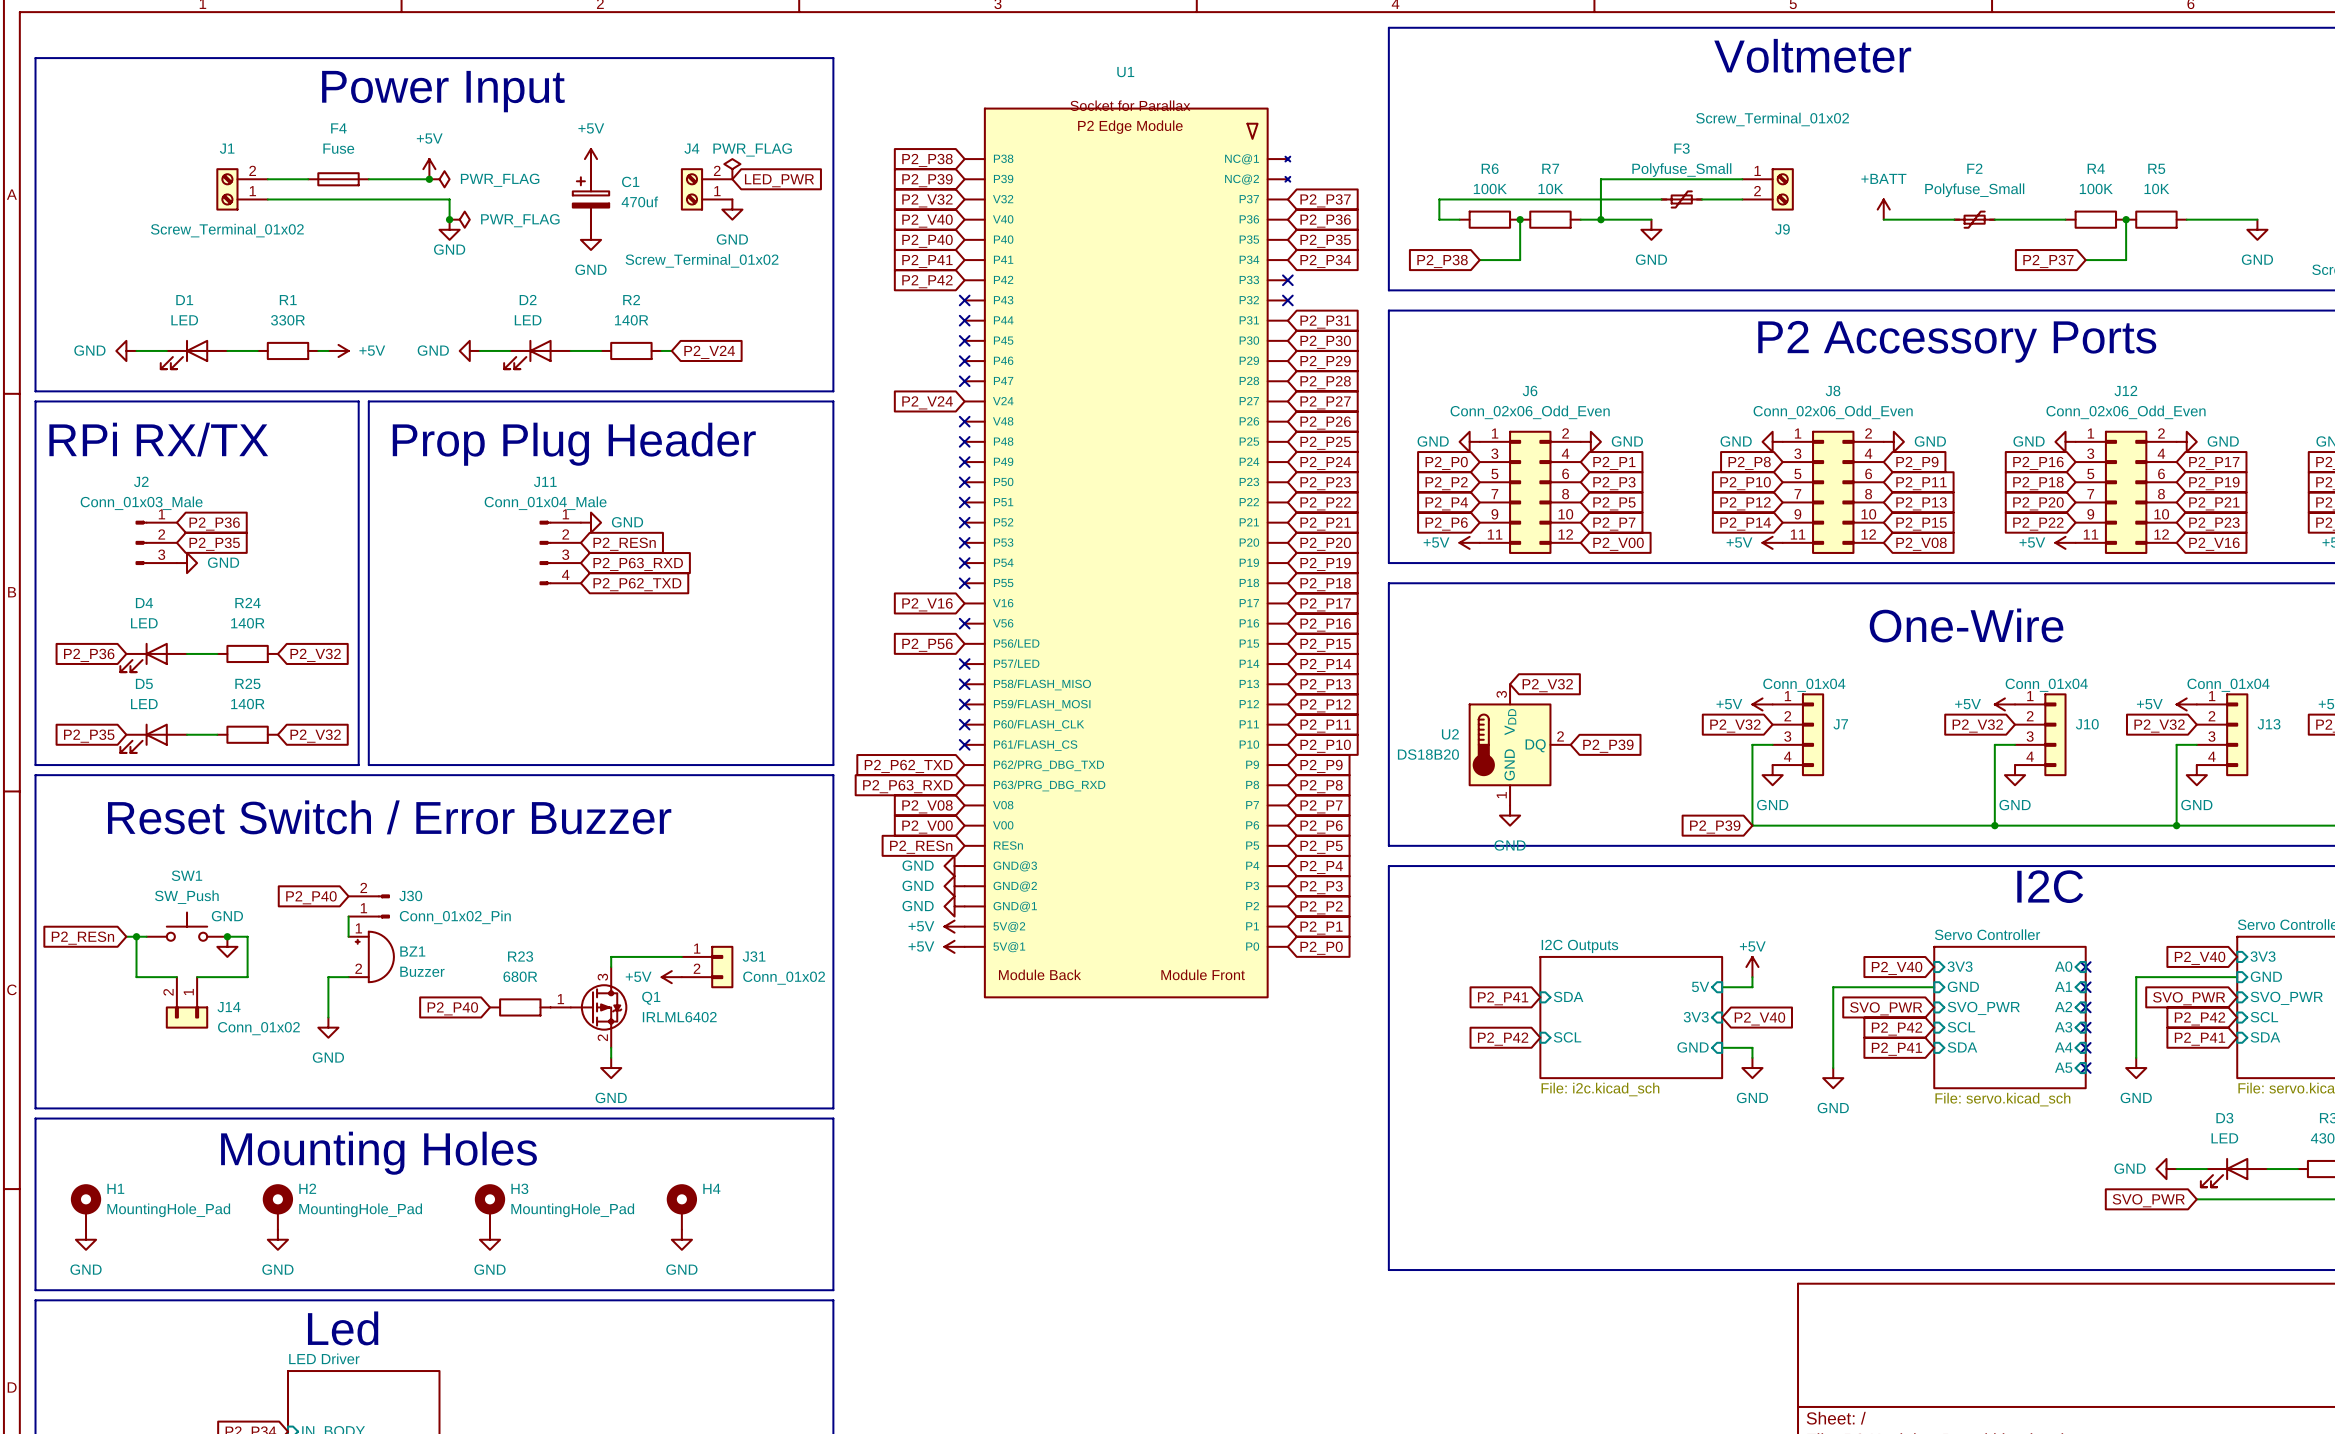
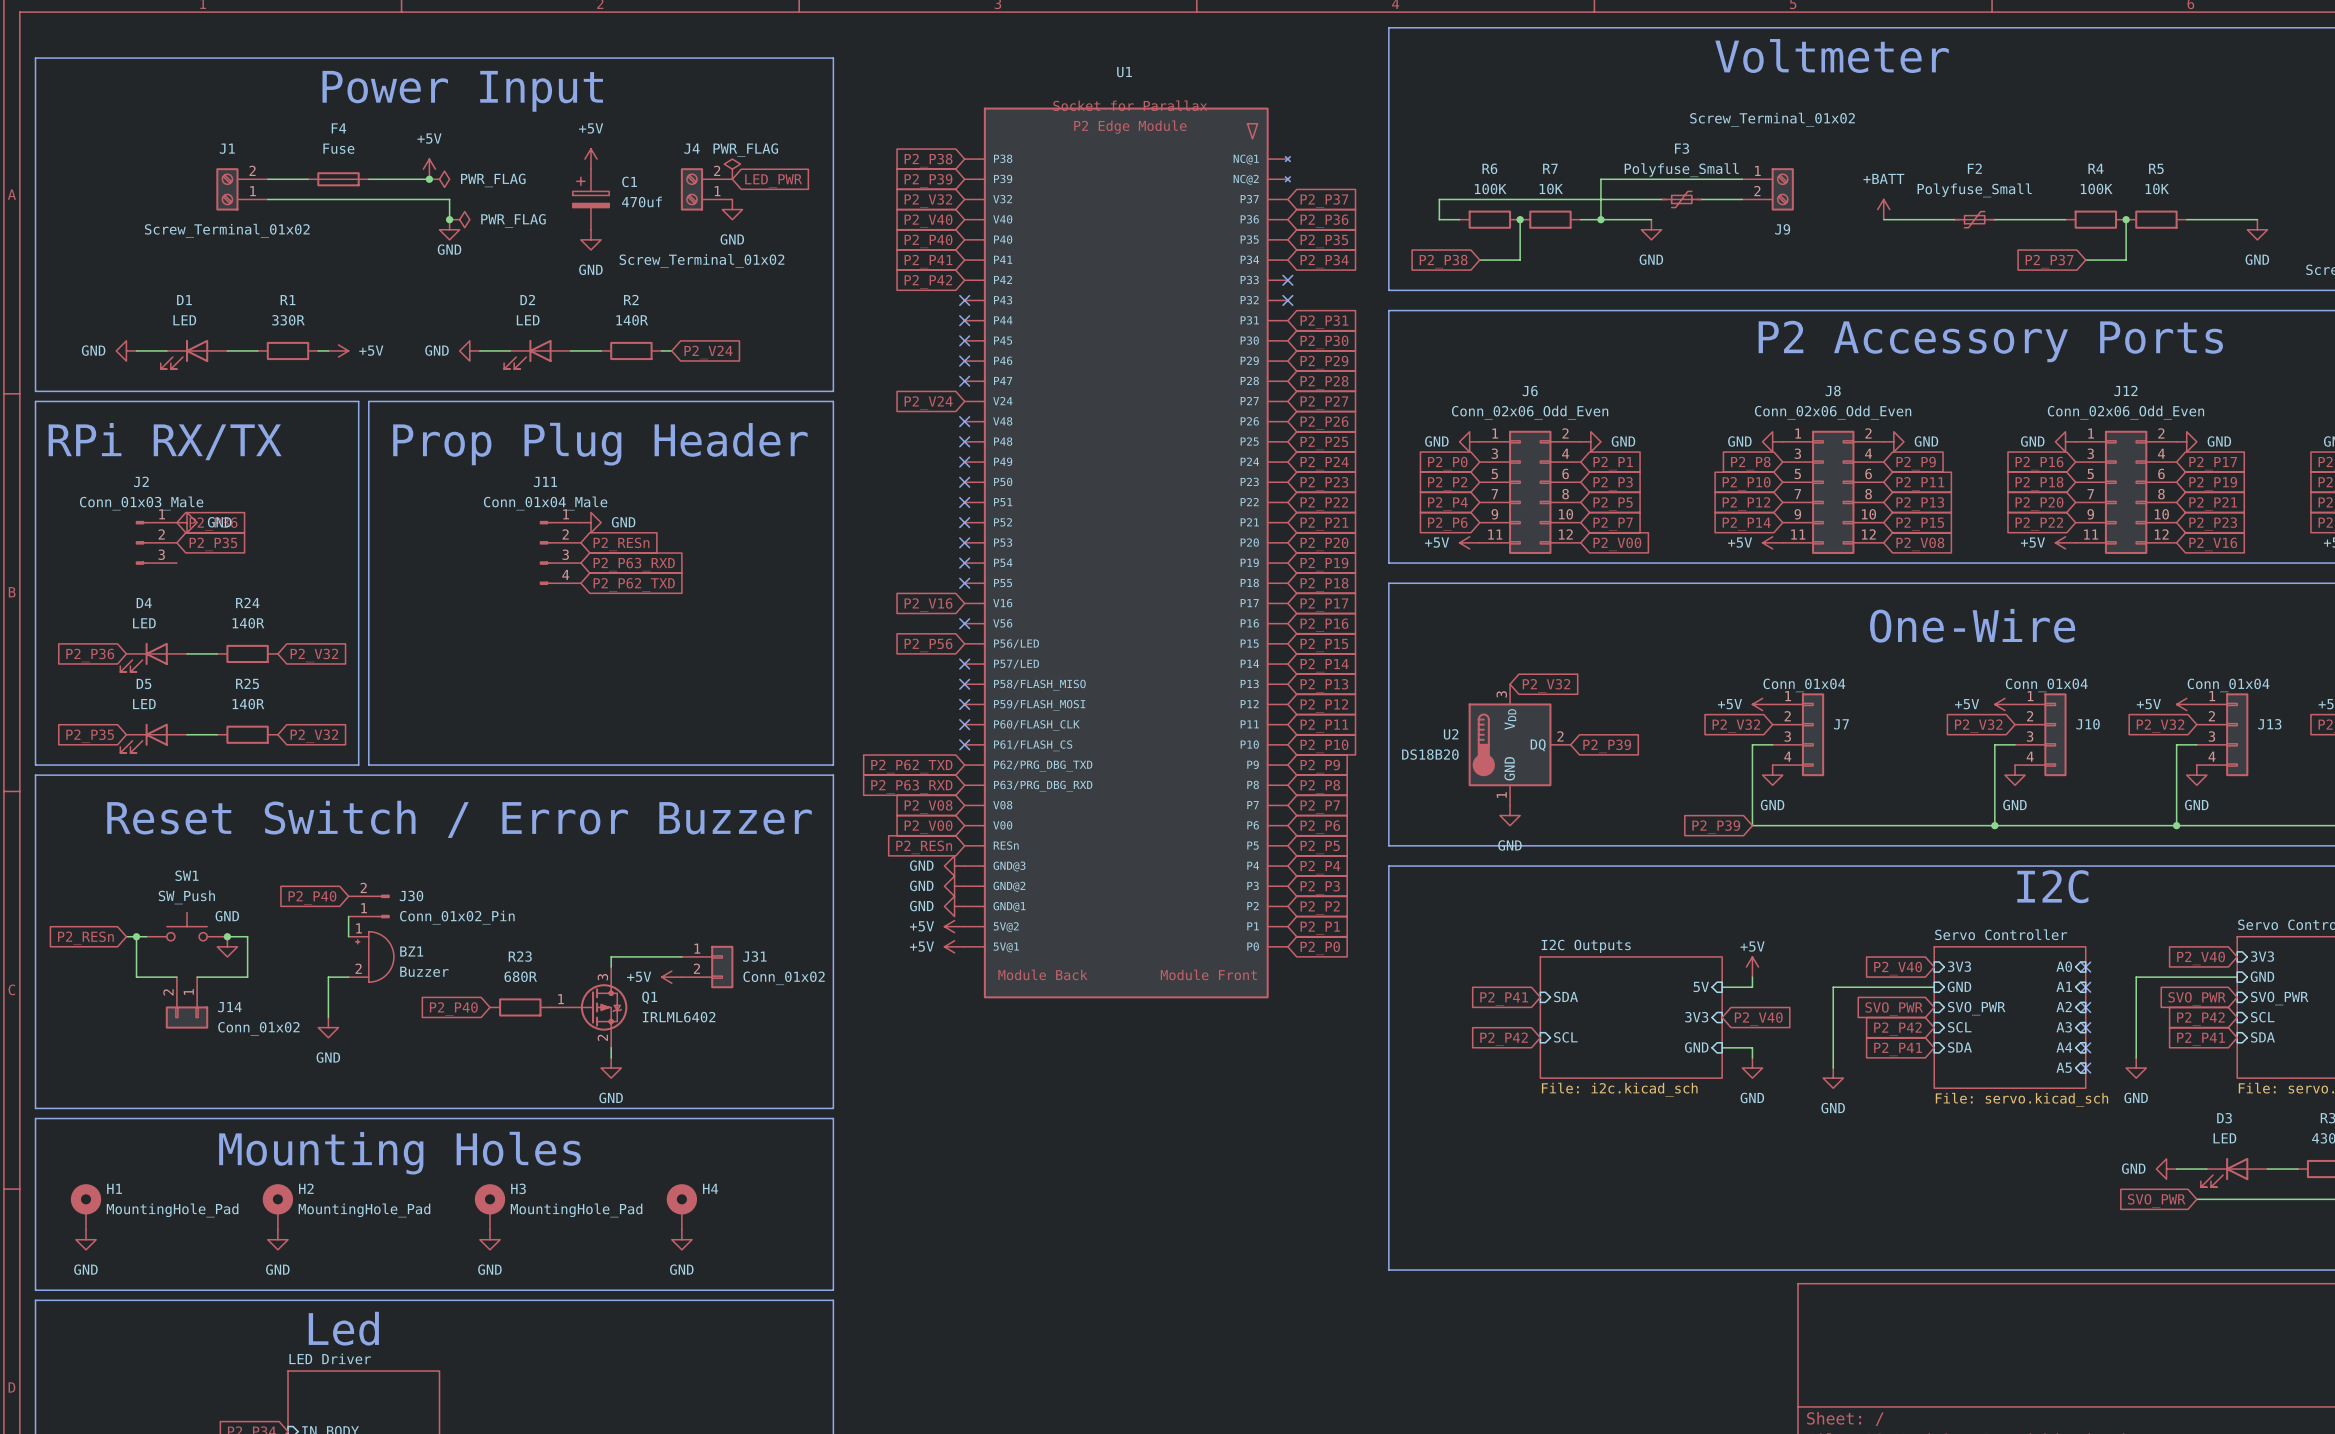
power symbol position: GND (187, 563) -> GND (187, 522)

